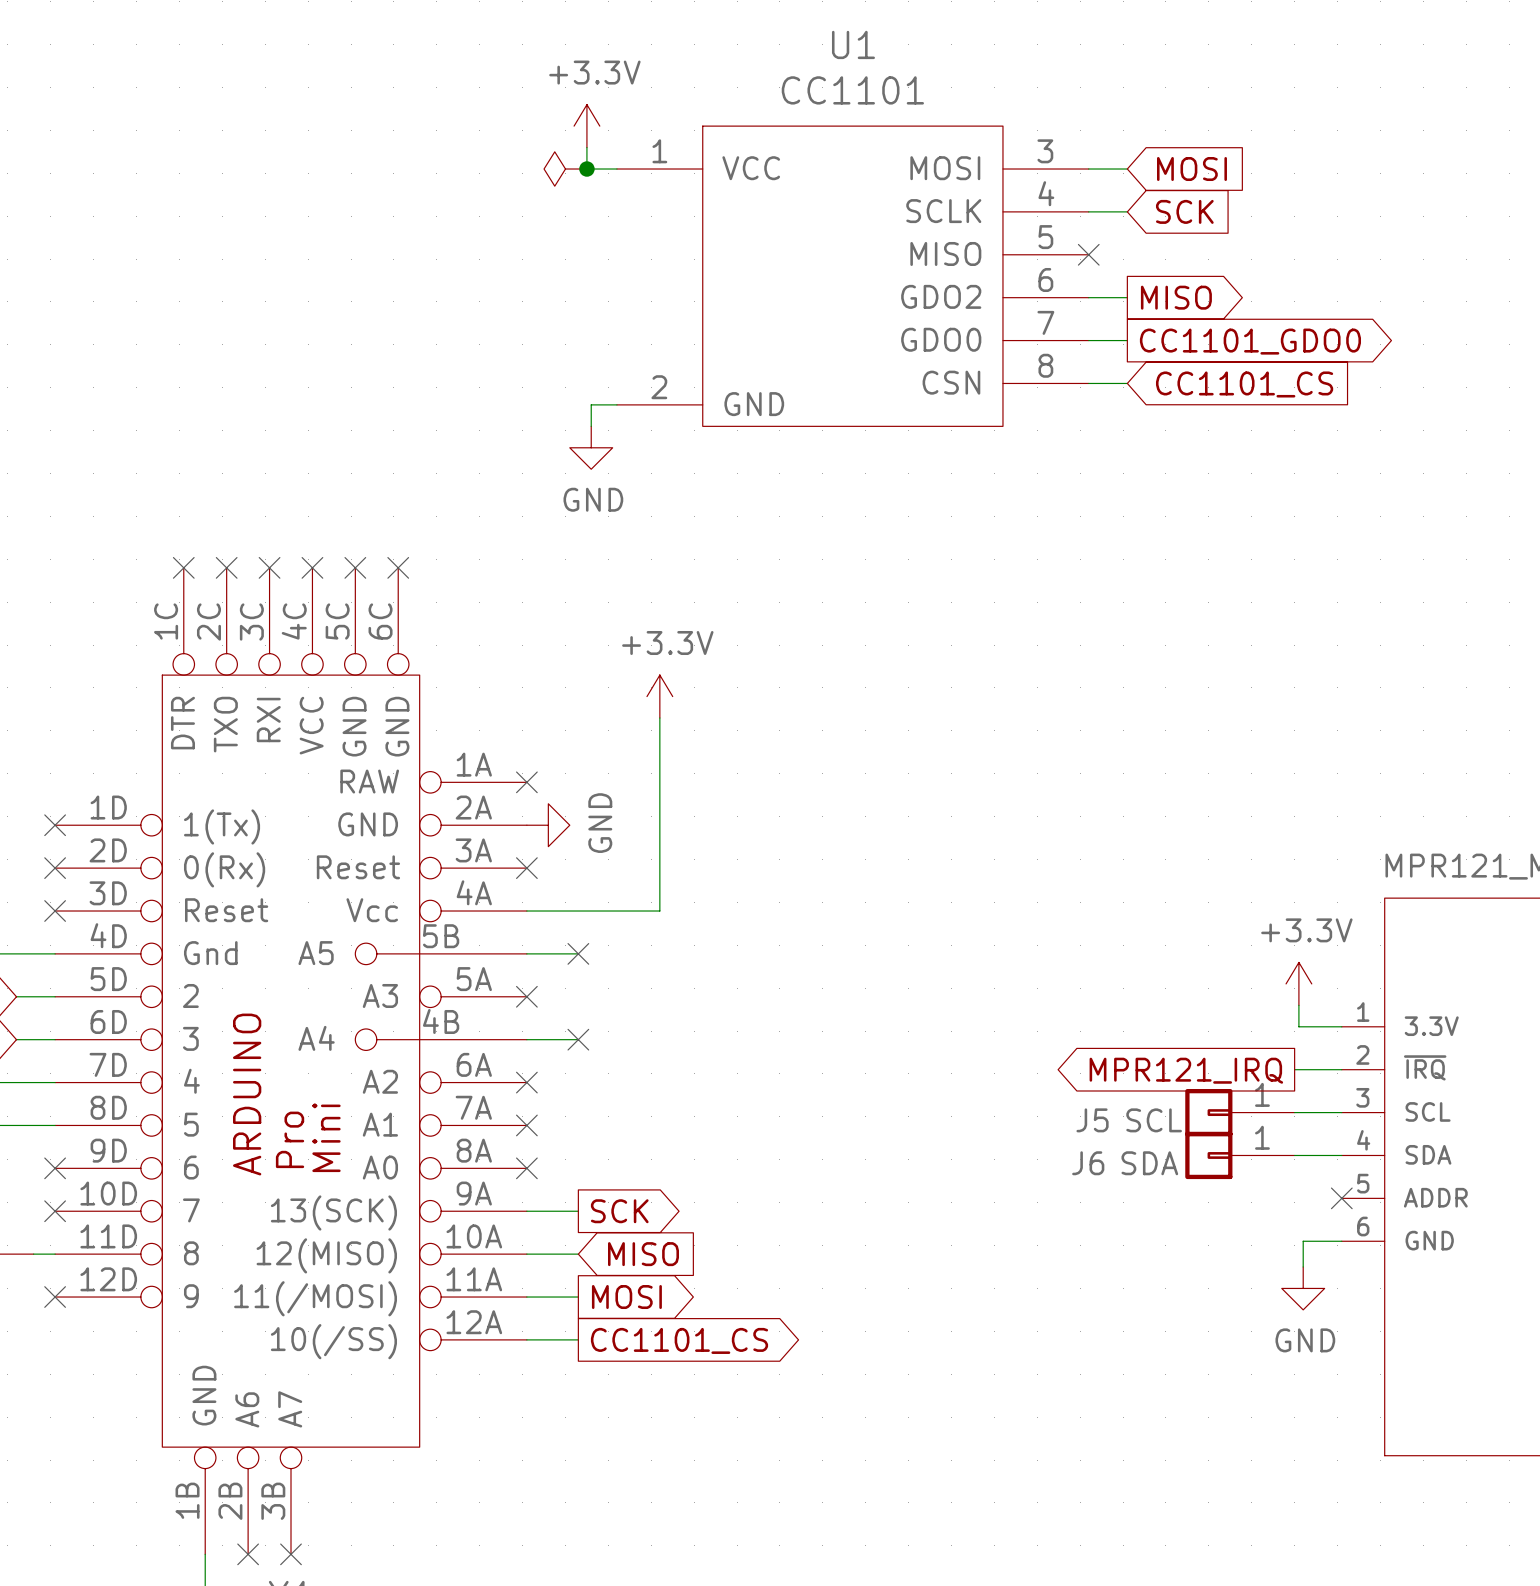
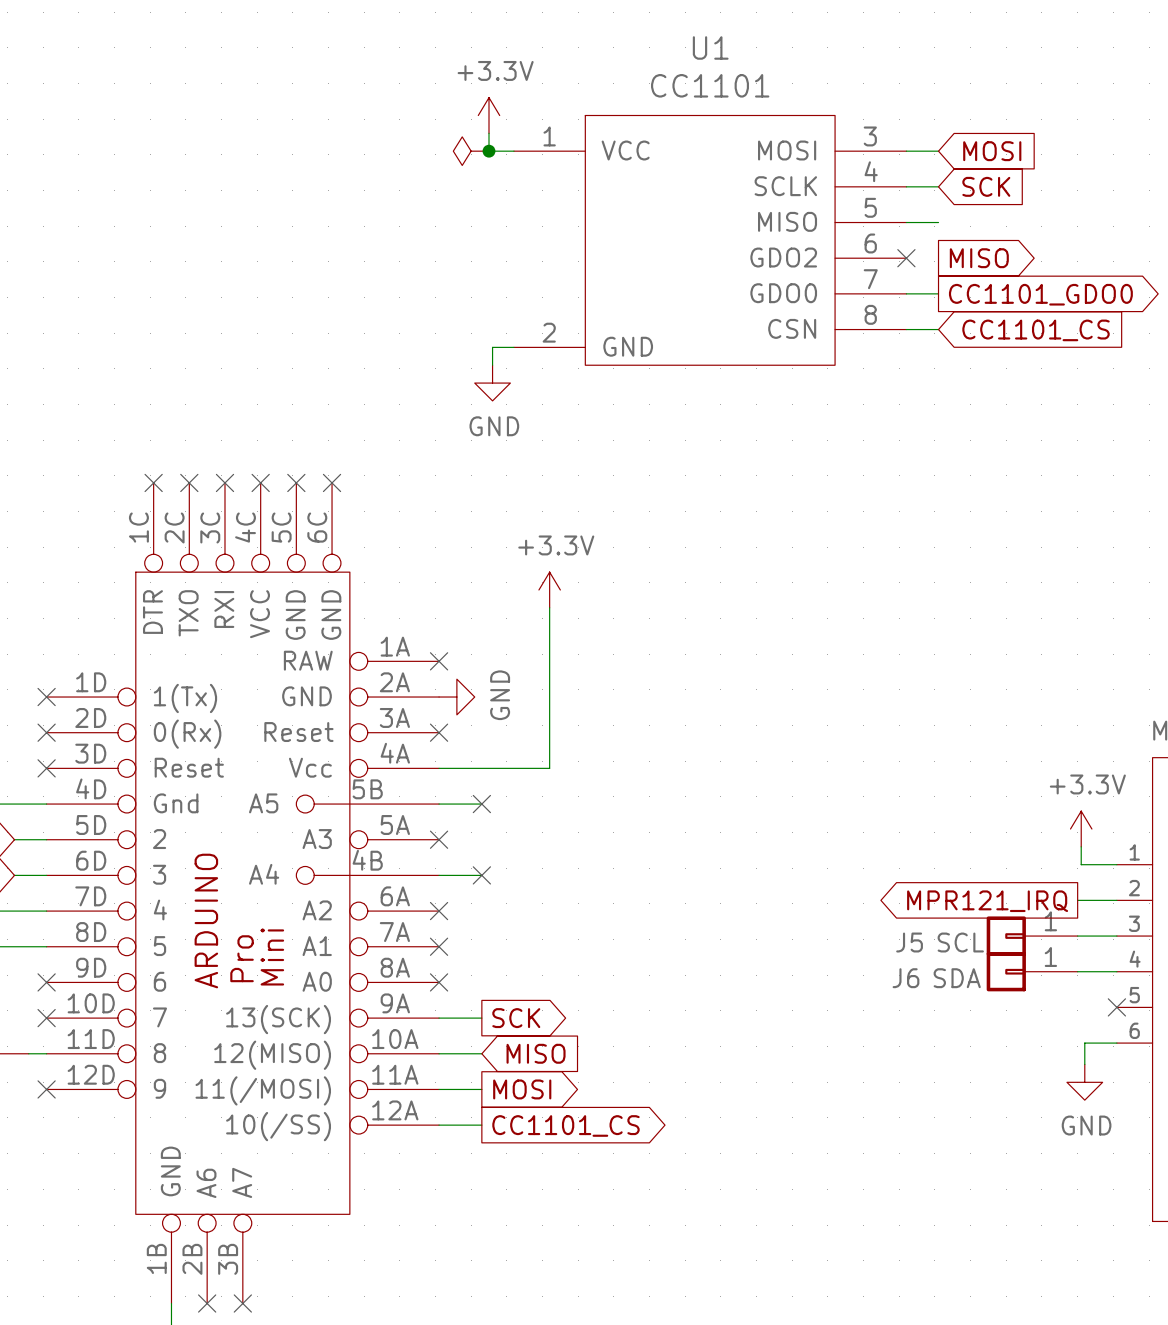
no-connect mark position: (1088, 254) -> (906, 258)
wire: (1088, 297) (1127, 297) -> (906, 222) (938, 222)

